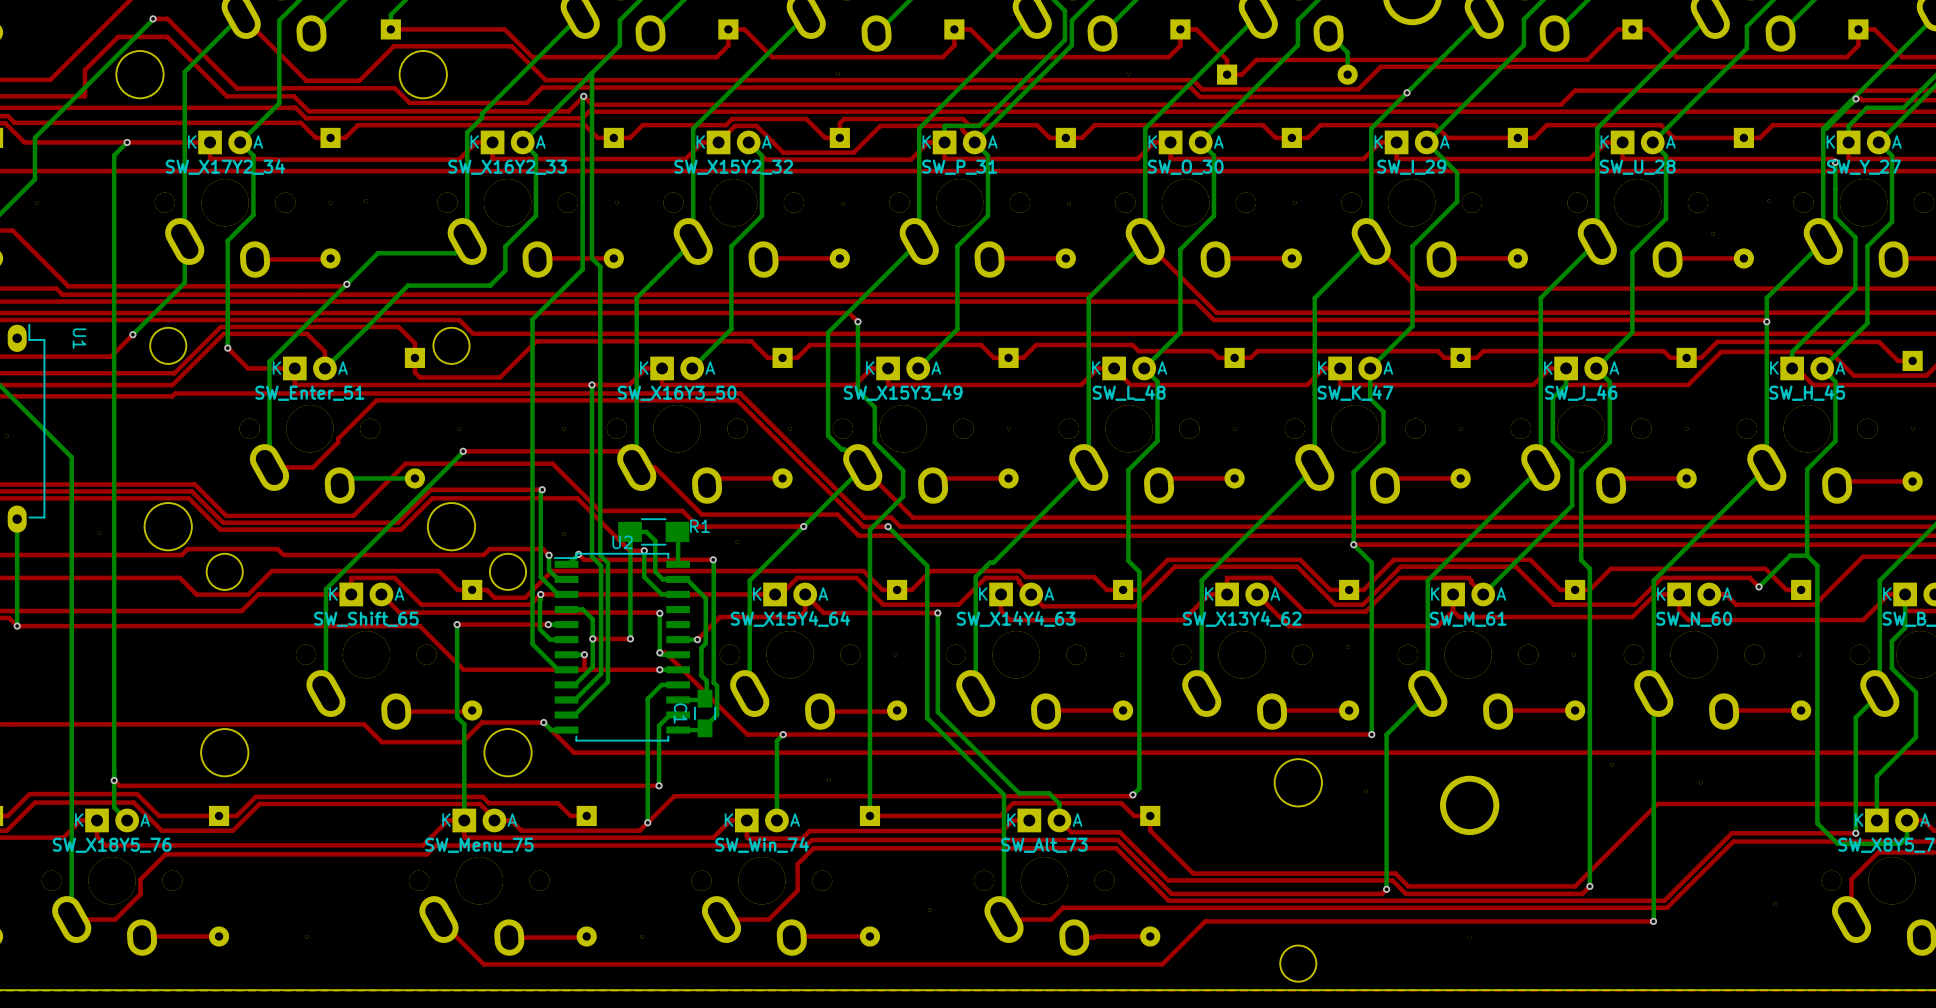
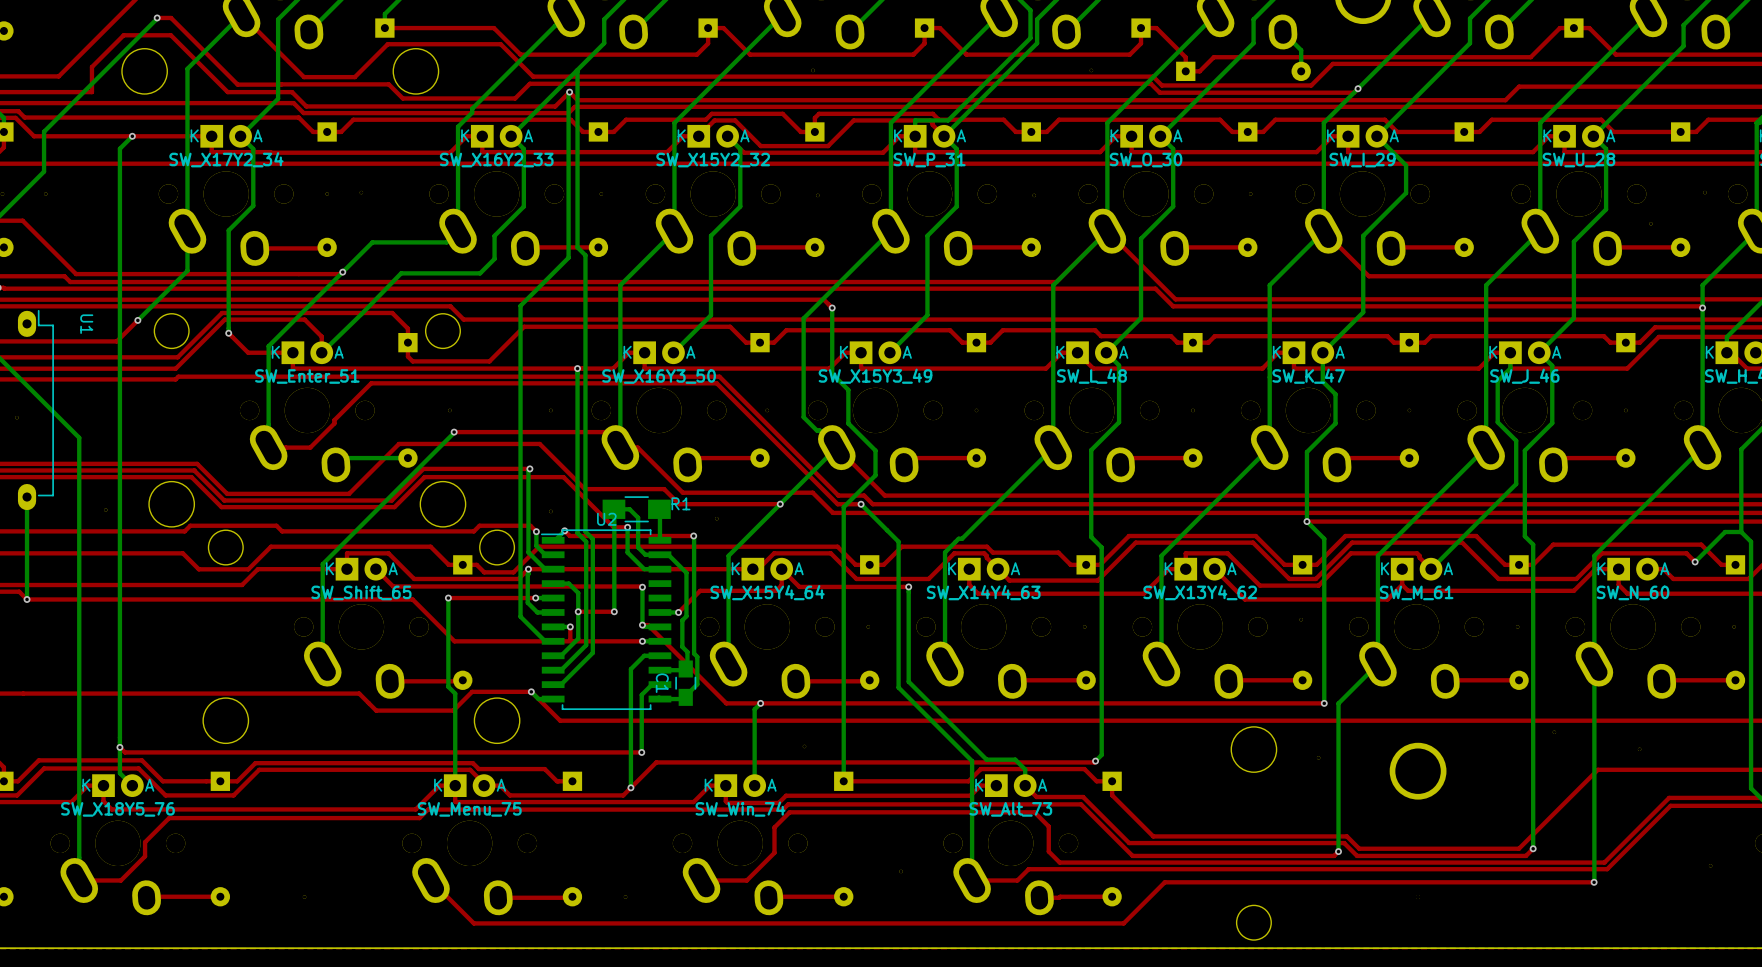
top track: (1069, 848) (1116, 848) (1168, 900) -> (1034, 812) (1048, 826) (1048, 851) (1059, 862) (1129, 862)

